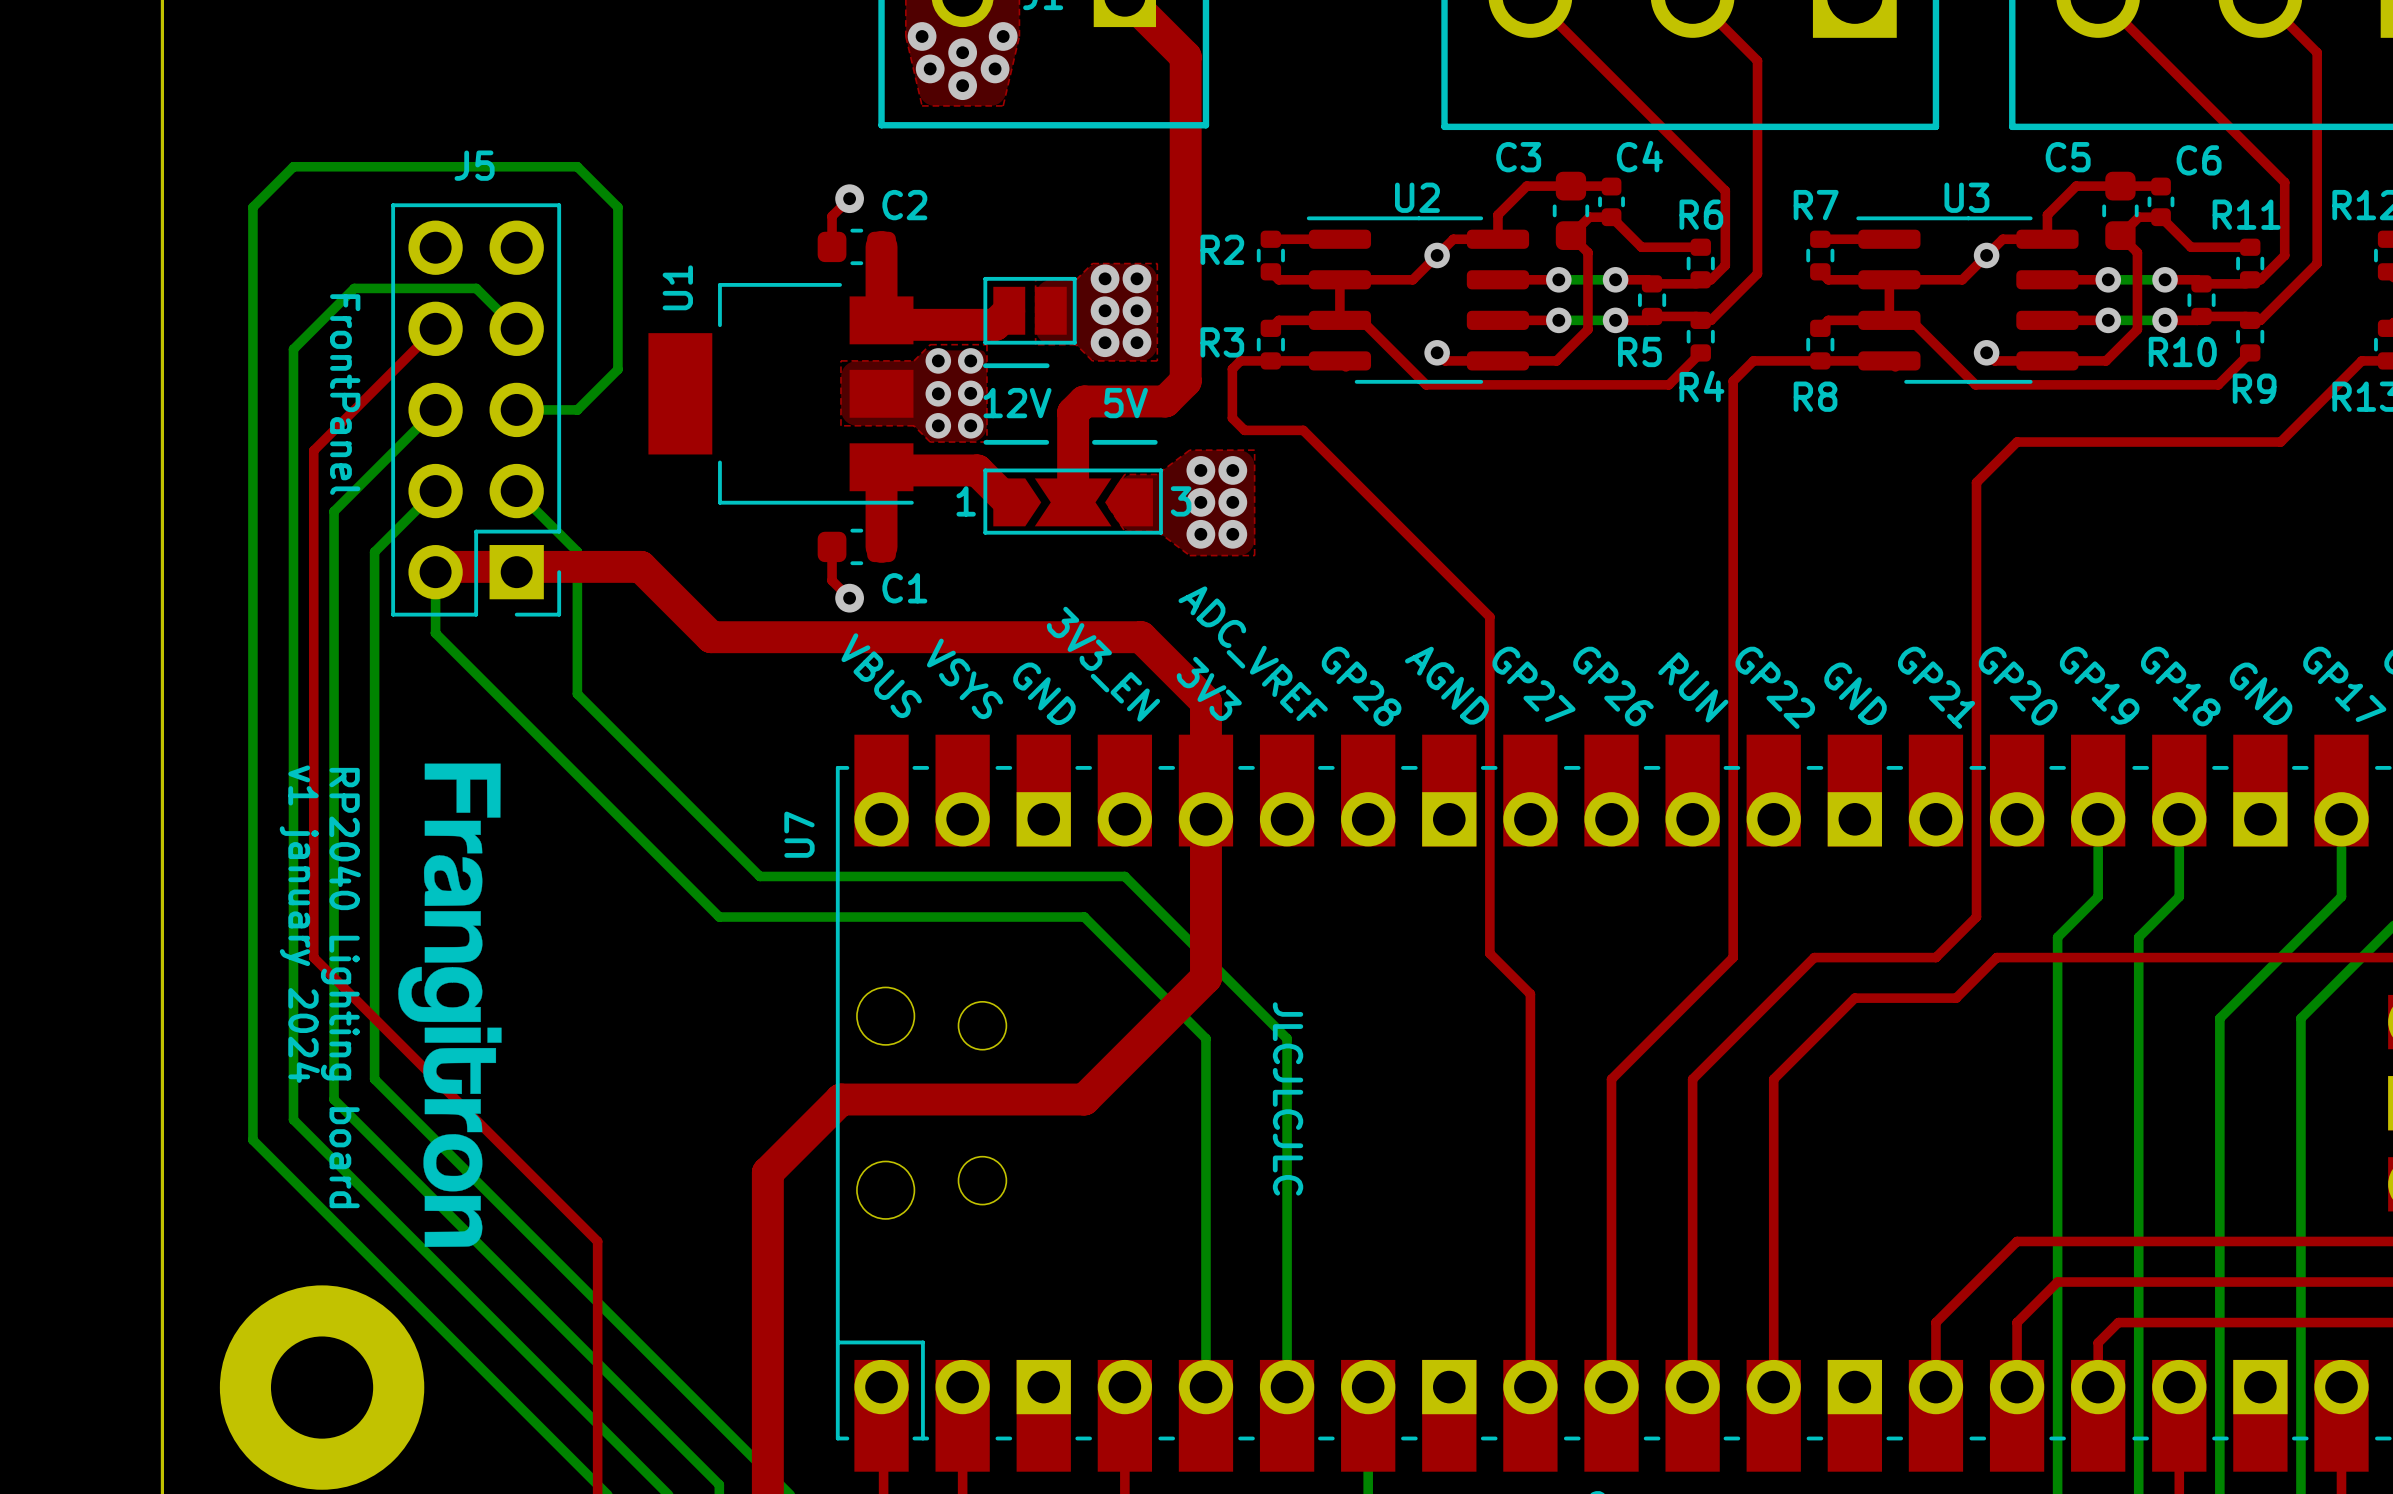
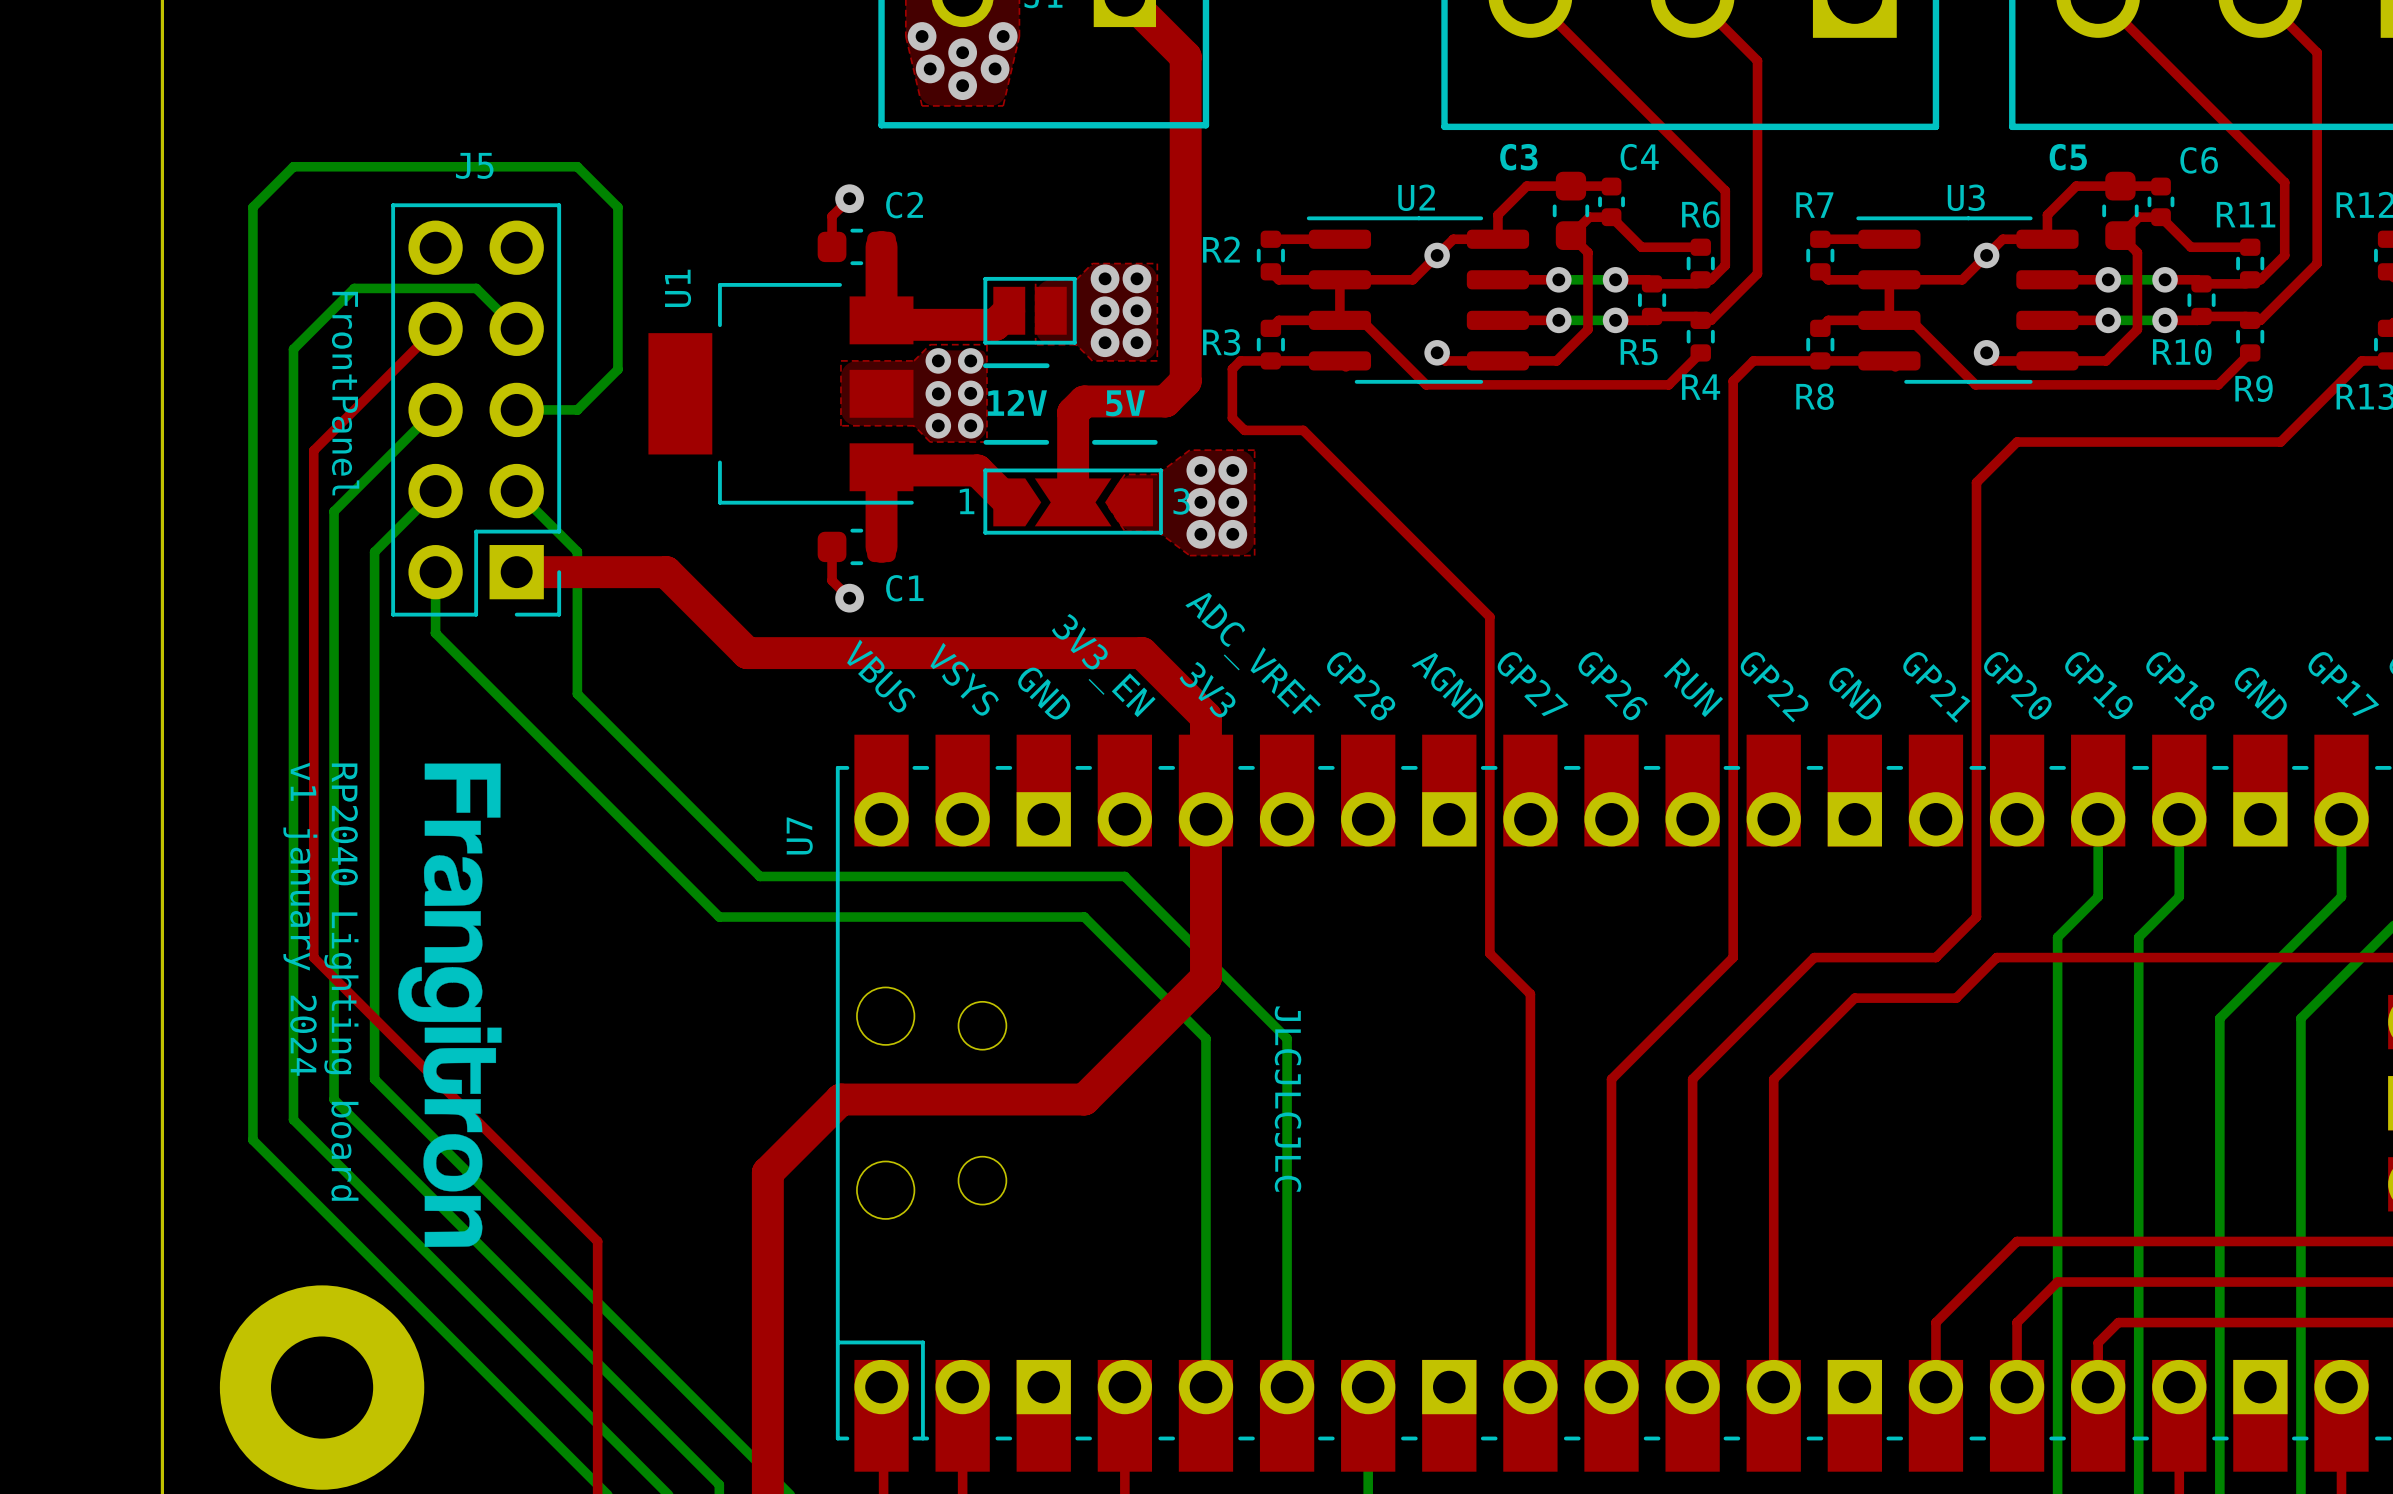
top track: (446, 566) (640, 566) (711, 637) (1141, 637) (1205, 702) (1205, 716) -> (516, 572) (666, 572) (747, 653) (1142, 653) (1205, 716)

